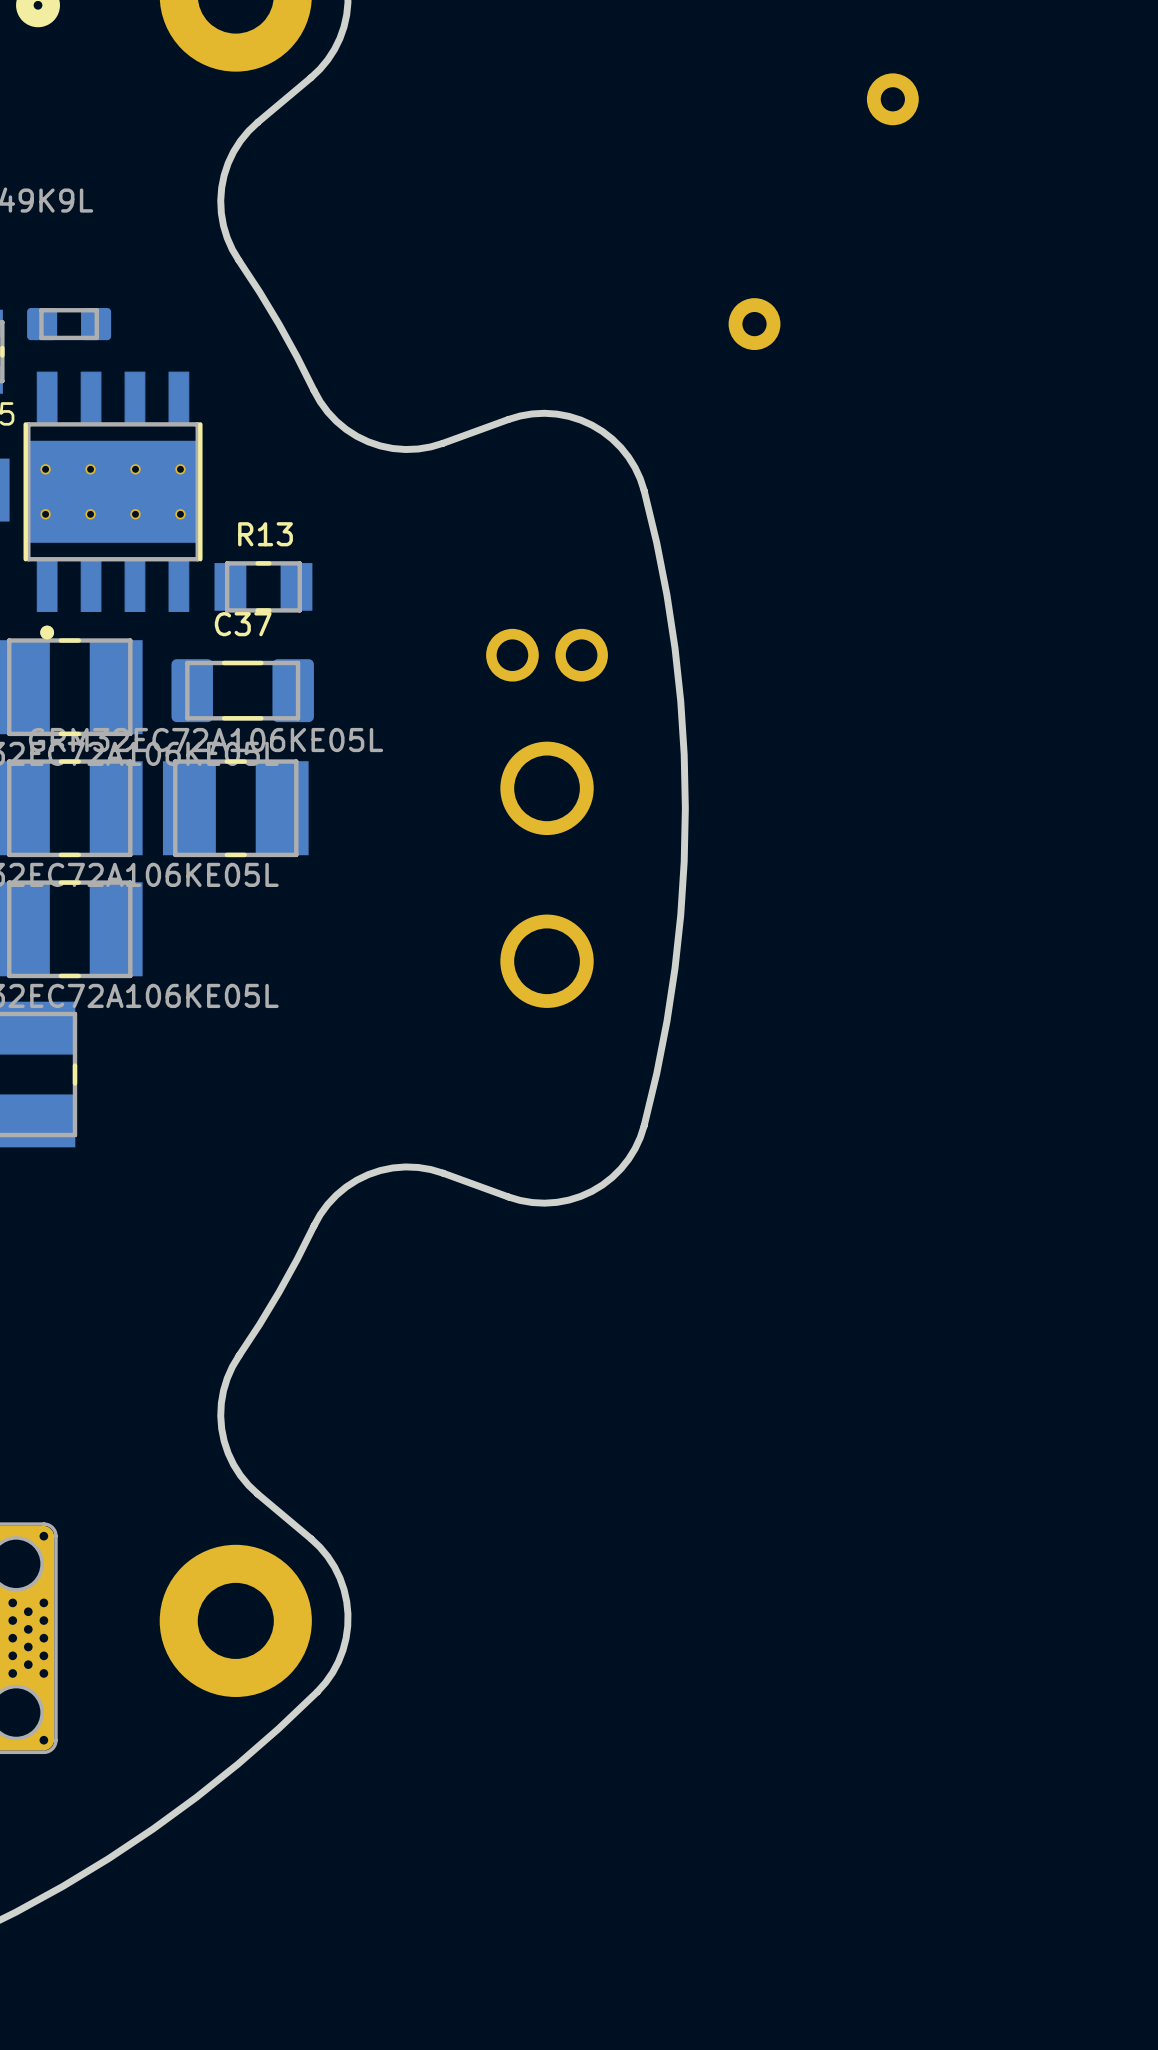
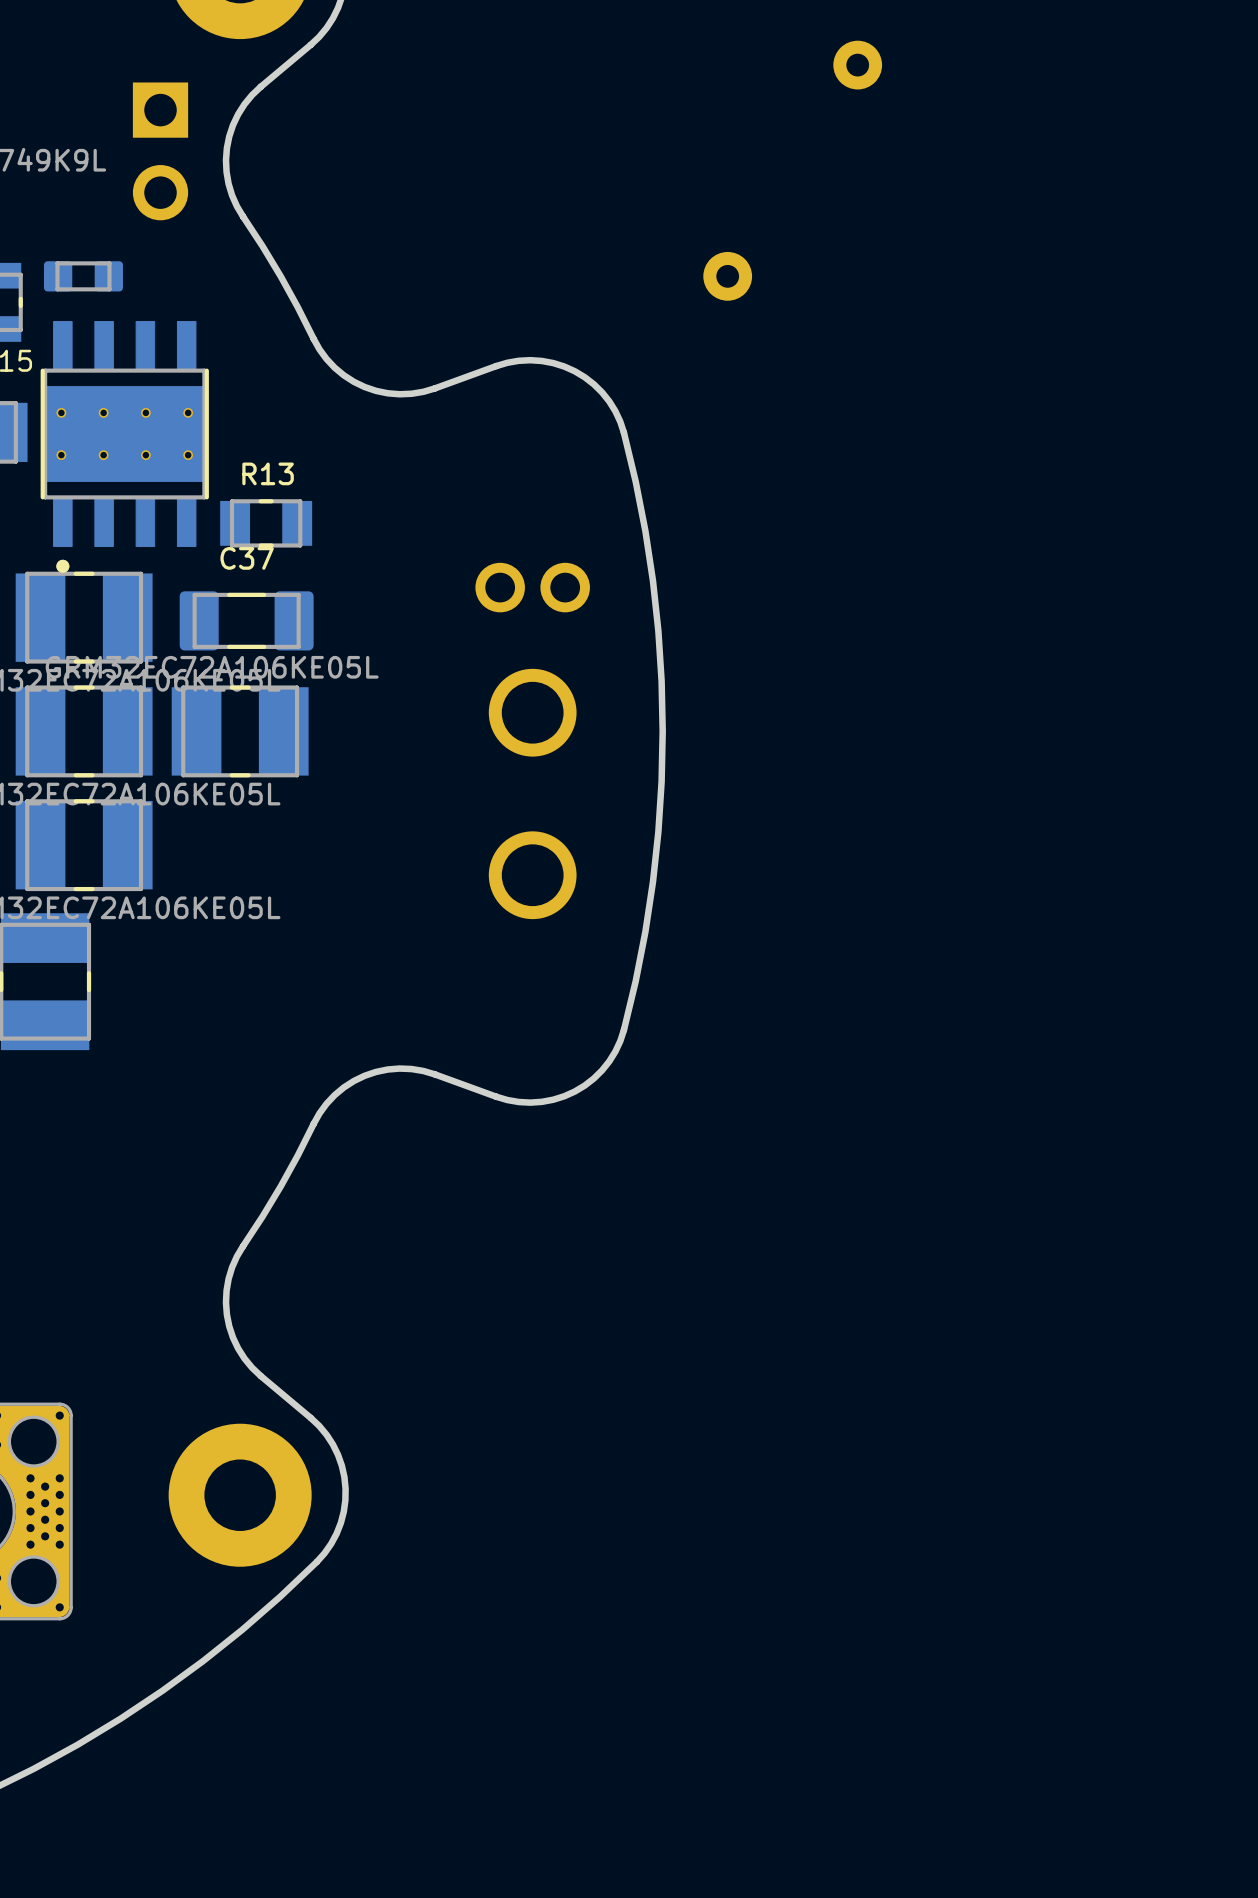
part: none -> (160, 151)

